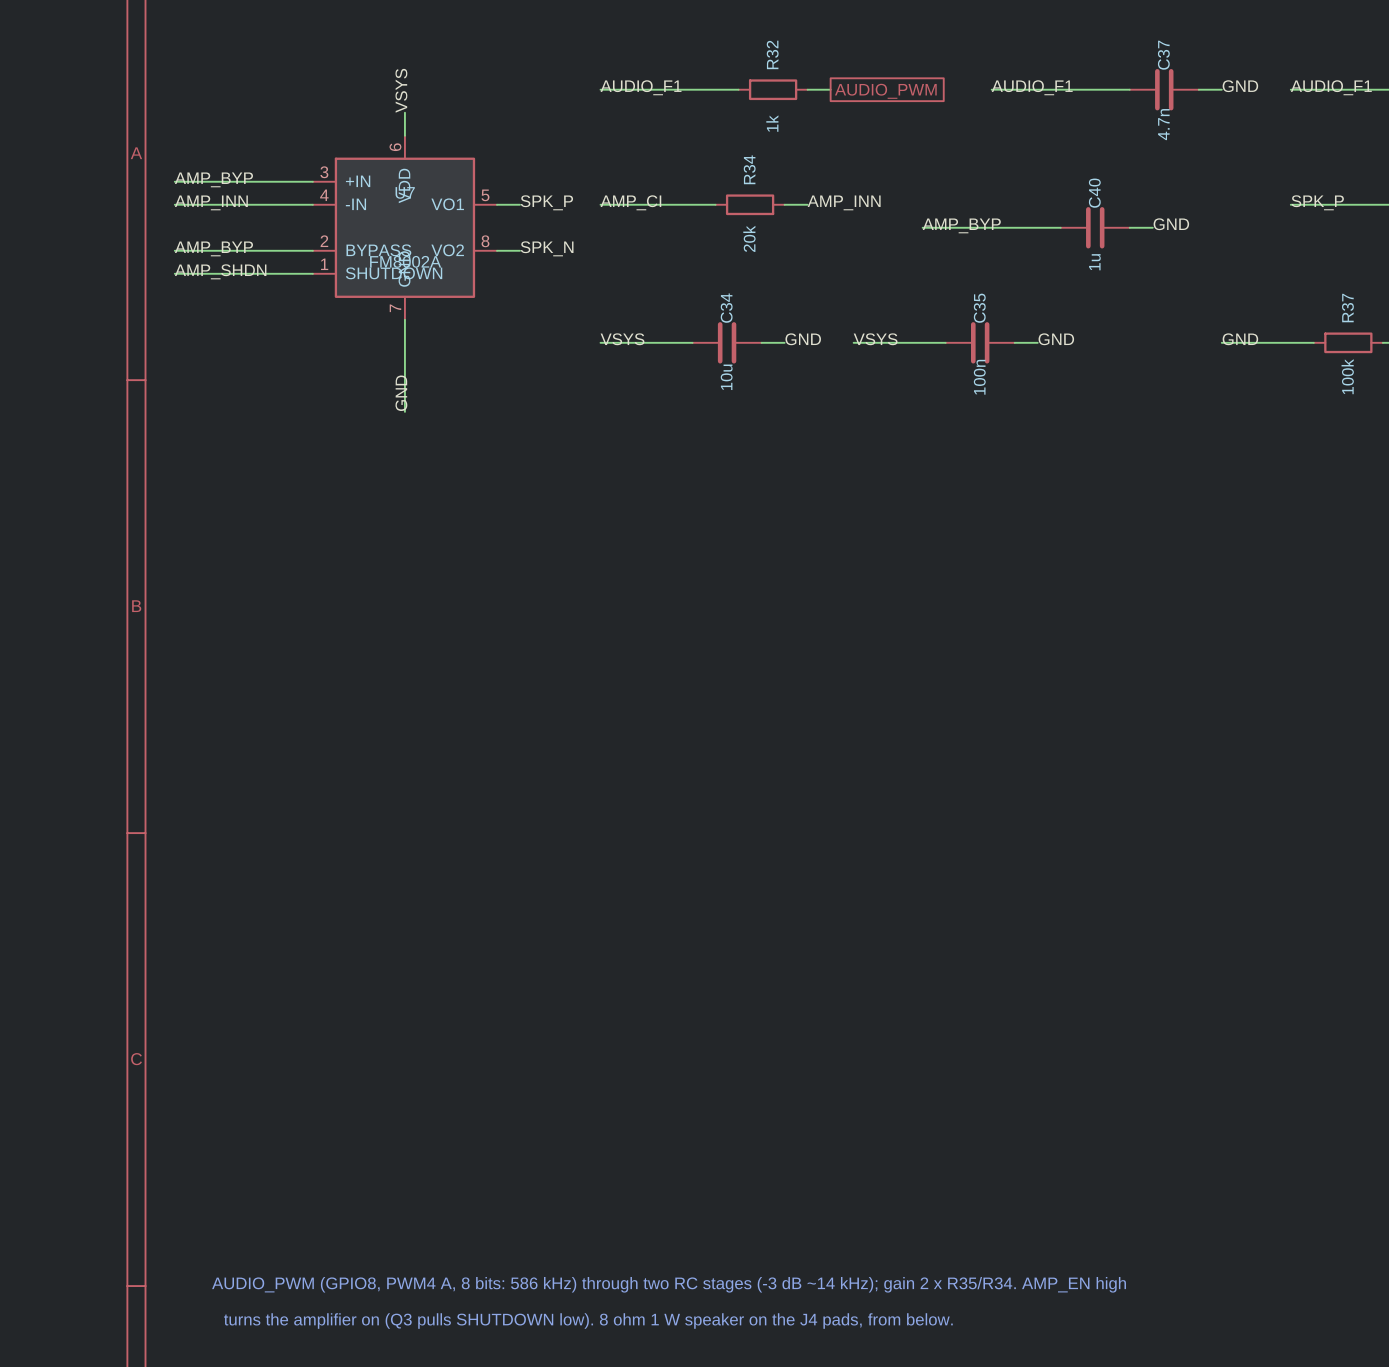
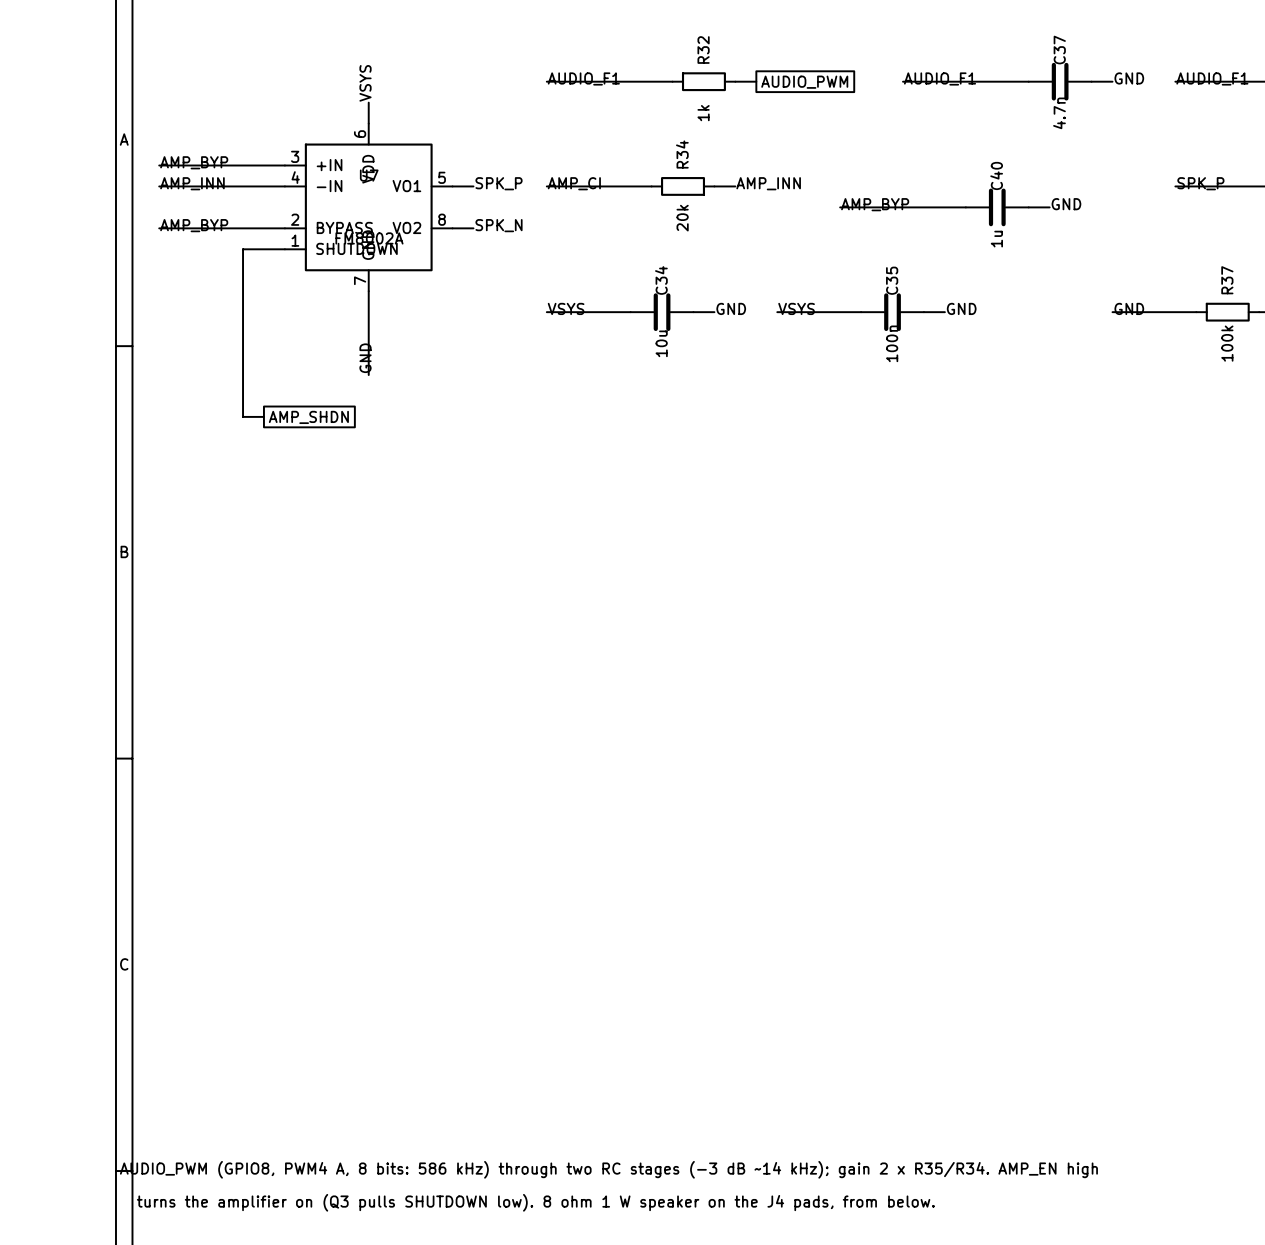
label: AMP_SHDN (220, 271) -> none
wire: (174, 273) (266, 273) -> (263, 416) (243, 416) (243, 249)
global label: none -> AMP_SHDN (308, 417)

